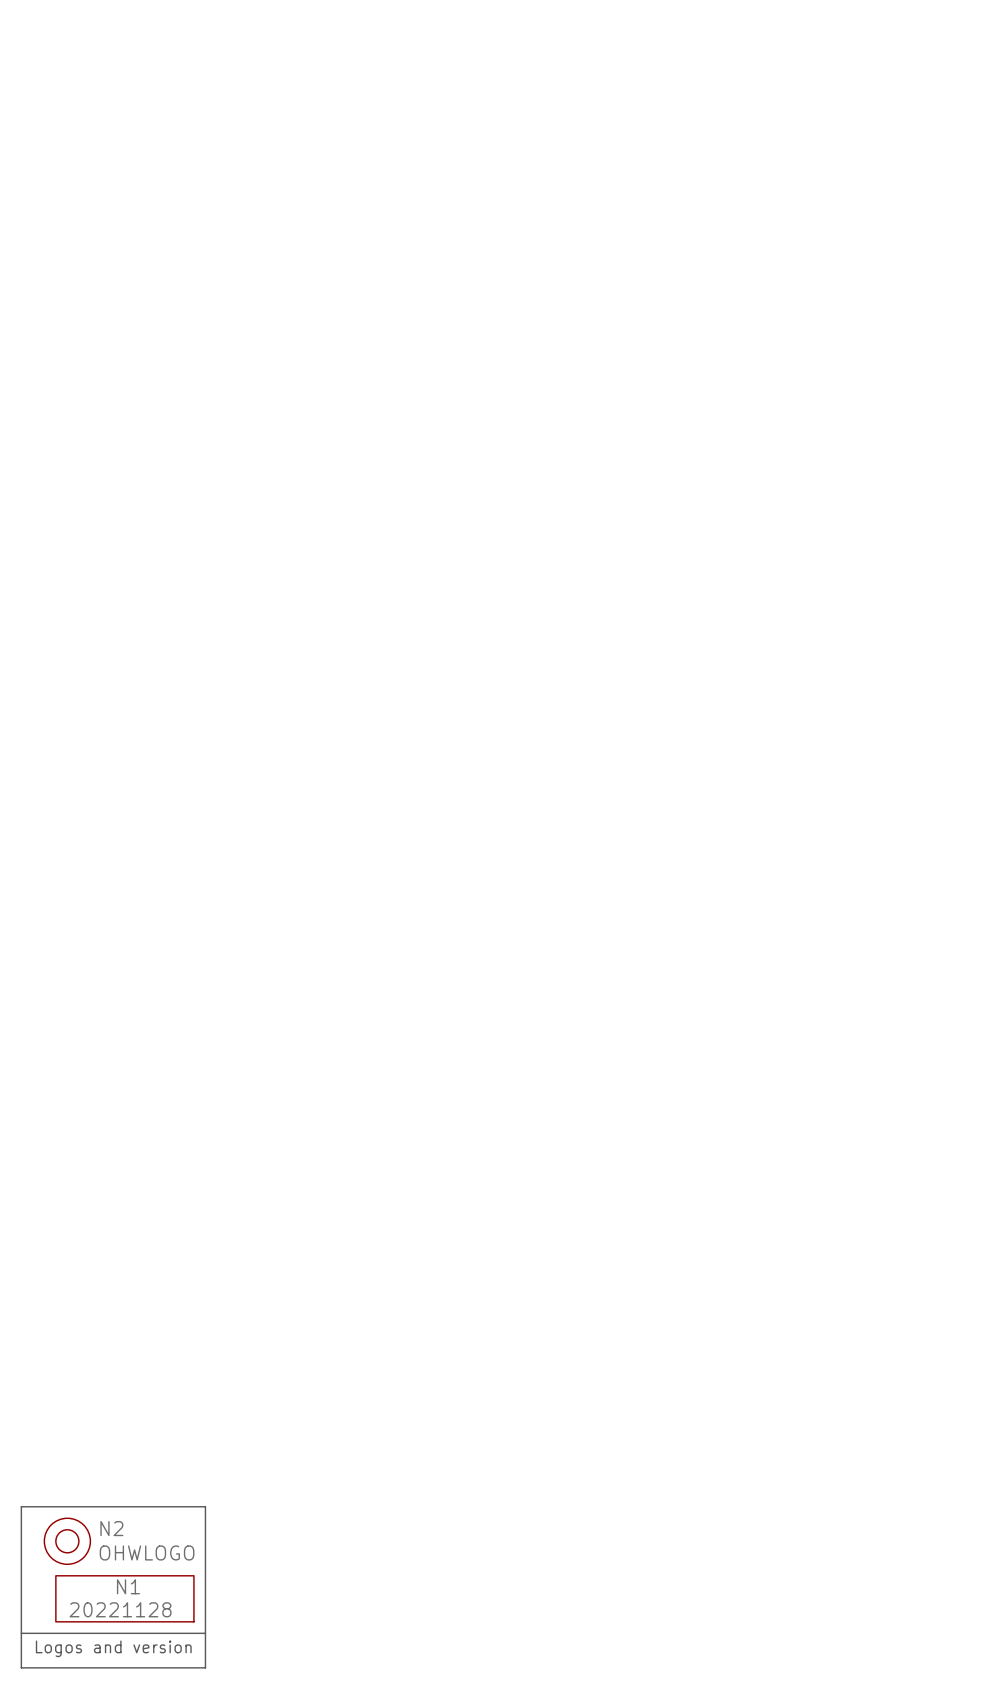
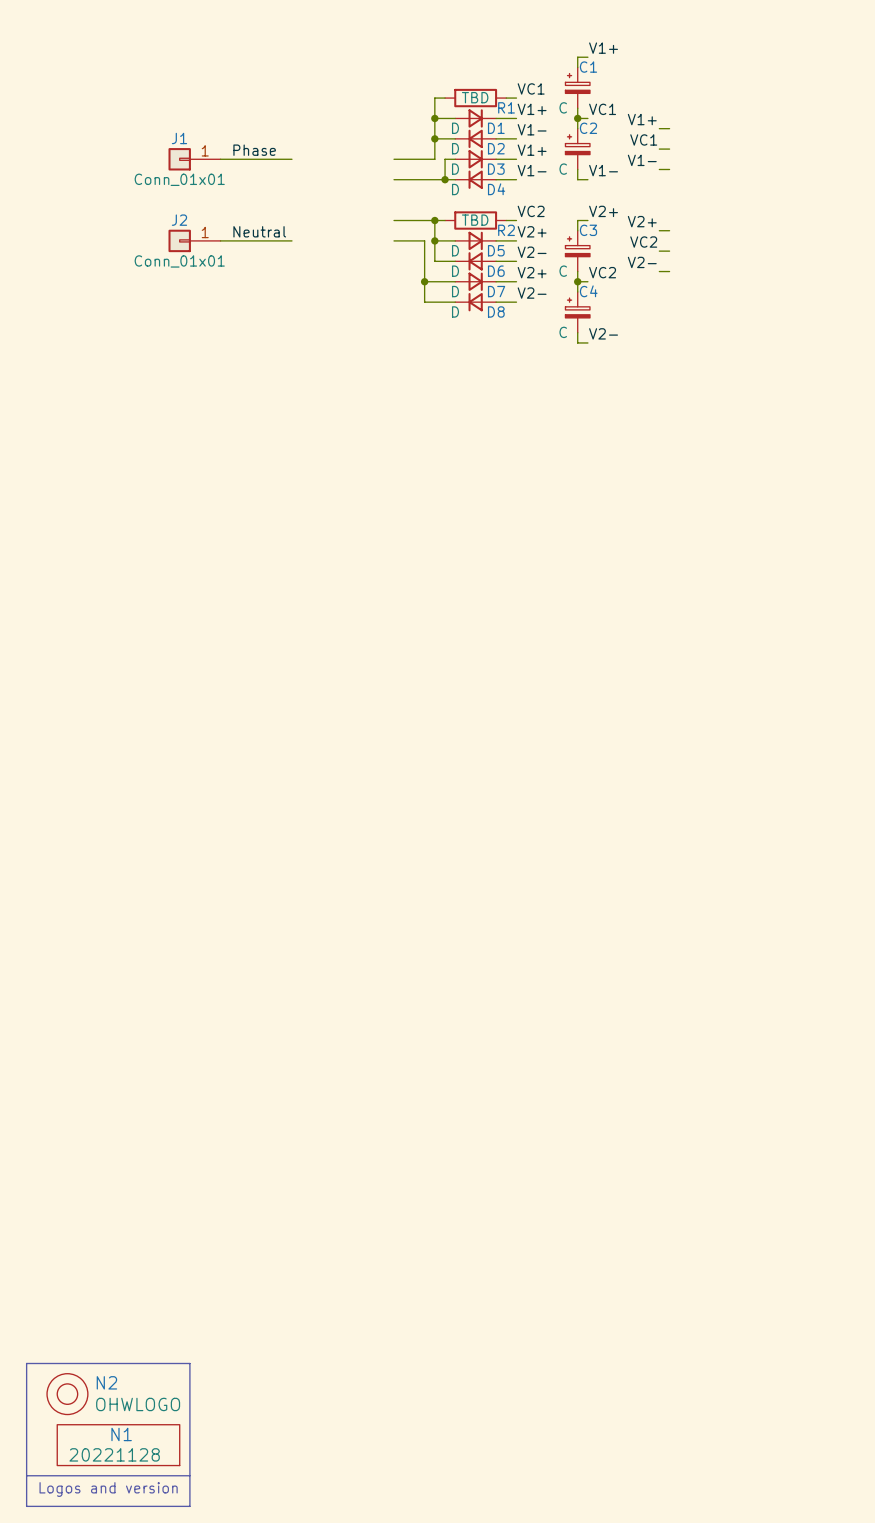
label: none -> V1+ (603, 48)
wire: none -> (587, 57) (577, 57) (577, 67)
C1: none -> C (577, 87)
label: none -> VC1 (531, 88)
wire: none -> (445, 98) (434, 98) (434, 159) (394, 159)
R1: none -> TBD (475, 98)
wire: none -> (506, 98) (516, 98)
wire: none -> (577, 108) (577, 128)
label: none -> V1+ (532, 109)
label: none -> VC1 (602, 109)
wire: none -> (434, 118) (455, 118)
junction: none -> (434, 118)
D1: none -> D (475, 118)
wire: none -> (496, 118) (516, 118)
wire: none -> (577, 118) (587, 118)
junction: none -> (577, 118)
label: none -> V1+ (642, 119)
wire: none -> (659, 128) (669, 128)
label: none -> V1- (532, 129)
wire: none -> (434, 138) (455, 138)
junction: none -> (434, 138)
D2: none -> D (475, 138)
wire: none -> (496, 138) (516, 138)
label: none -> VC1 (643, 139)
C2: none -> C (577, 149)
wire: none -> (659, 149) (669, 149)
label: none -> Phase (254, 150)
label: none -> V1+ (532, 150)
J1: none -> Conn_01x01 (194, 159)
wire: none -> (220, 159) (291, 159)
wire: none -> (455, 159) (445, 159) (445, 179)
D3: none -> D (475, 159)
wire: none -> (496, 159) (516, 159)
label: none -> V1- (642, 160)
wire: none -> (577, 169) (577, 179) (587, 179)
wire: none -> (659, 169) (669, 169)
label: none -> V1- (532, 170)
label: none -> V1- (603, 170)
wire: none -> (394, 179) (455, 179)
junction: none -> (445, 179)
D4: none -> D (475, 179)
wire: none -> (496, 179) (516, 179)
label: none -> VC2 (531, 211)
label: none -> V2+ (603, 211)
wire: none -> (394, 220) (445, 220)
wire: none -> (434, 220) (434, 261) (455, 261)
junction: none -> (434, 220)
R2: none -> TBD (475, 220)
wire: none -> (506, 220) (516, 220)
wire: none -> (587, 220) (577, 220) (577, 230)
label: none -> V2+ (642, 221)
wire: none -> (659, 230) (669, 230)
label: none -> Neutral (259, 231)
label: none -> V2+ (532, 231)
J2: none -> Conn_01x01 (194, 240)
wire: none -> (220, 240) (291, 240)
wire: none -> (394, 240) (424, 240) (424, 302) (455, 302)
wire: none -> (434, 240) (455, 240)
junction: none -> (434, 240)
D5: none -> D (475, 240)
wire: none -> (496, 240) (516, 240)
label: none -> VC2 (643, 242)
C3: none -> C (577, 251)
wire: none -> (659, 251) (669, 251)
label: none -> V2- (532, 252)
D6: none -> D (475, 261)
wire: none -> (496, 261) (516, 261)
label: none -> V2- (642, 262)
wire: none -> (577, 271) (577, 291)
wire: none -> (659, 271) (669, 271)
label: none -> V2+ (532, 272)
label: none -> VC2 (602, 272)
wire: none -> (424, 281) (455, 281)
junction: none -> (424, 281)
D7: none -> D (475, 281)
wire: none -> (496, 281) (516, 281)
wire: none -> (577, 281) (587, 281)
junction: none -> (577, 281)
label: none -> V2- (532, 293)
D8: none -> D (475, 302)
wire: none -> (496, 302) (516, 302)
C4: none -> C (577, 312)
wire: none -> (577, 332) (577, 342) (587, 342)
label: none -> V2- (603, 333)

